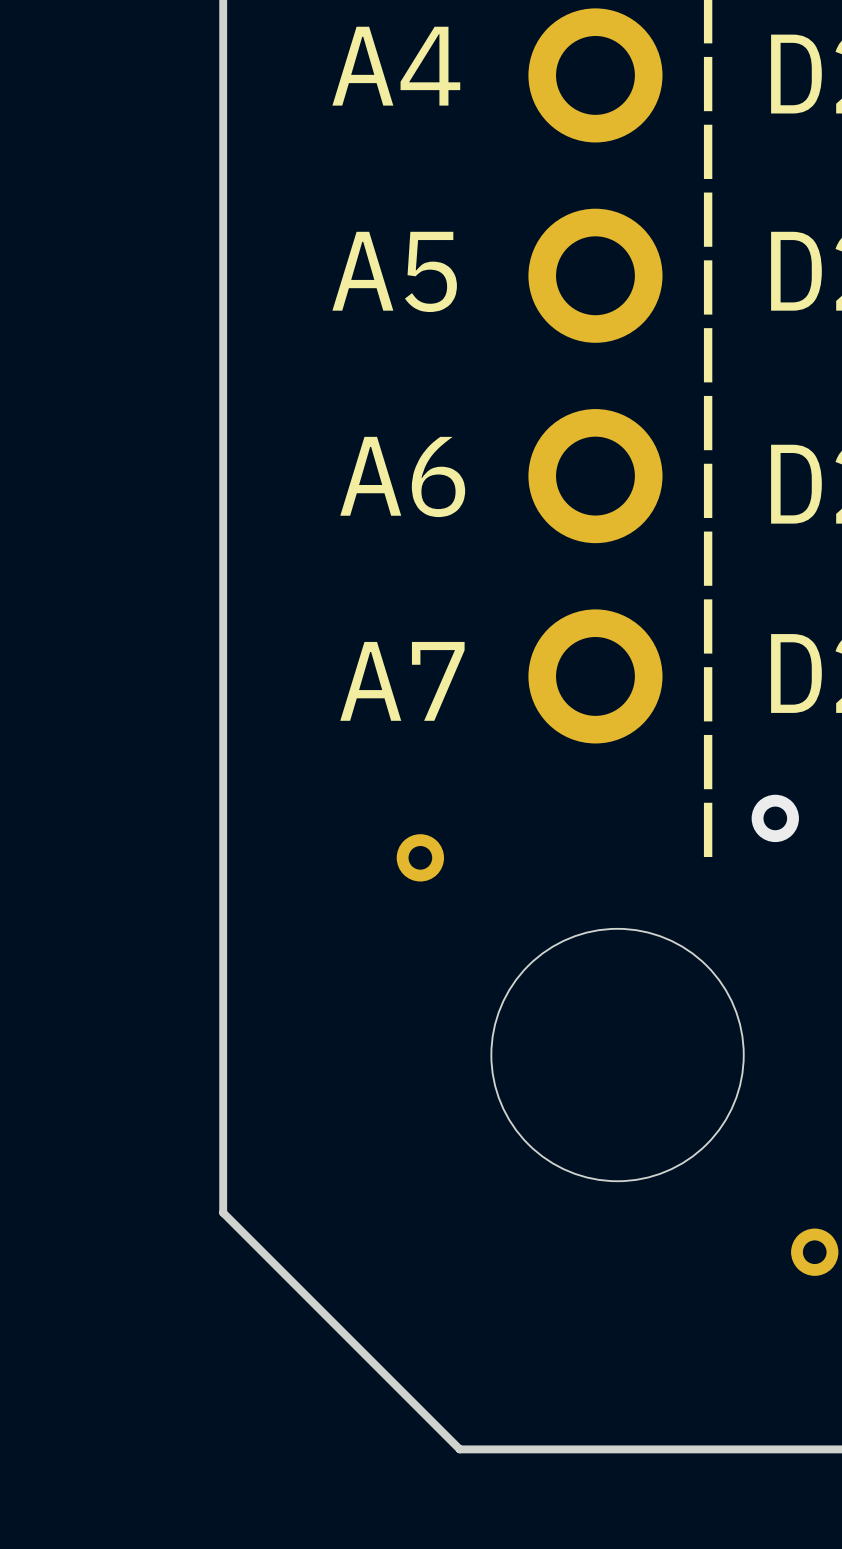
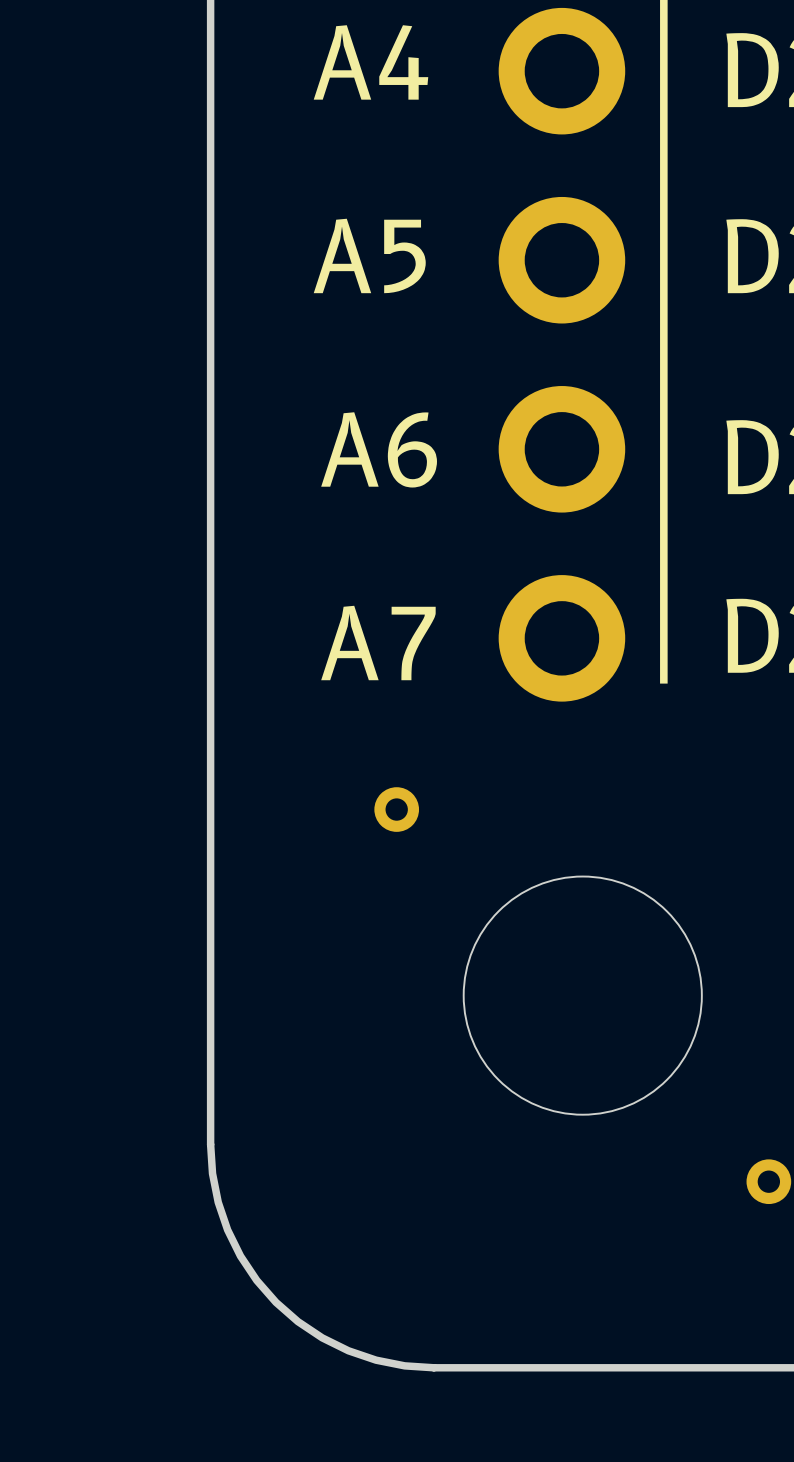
via: (775, 818) -> none
board edge: (223, 1212) (459, 1449) -> (210, 1144) (212, 1173) (218, 1202) (227, 1229) (240, 1256) (256, 1280) (276, 1302) (297, 1321) (322, 1337) (348, 1350) (376, 1360) (404, 1365) (433, 1367)

